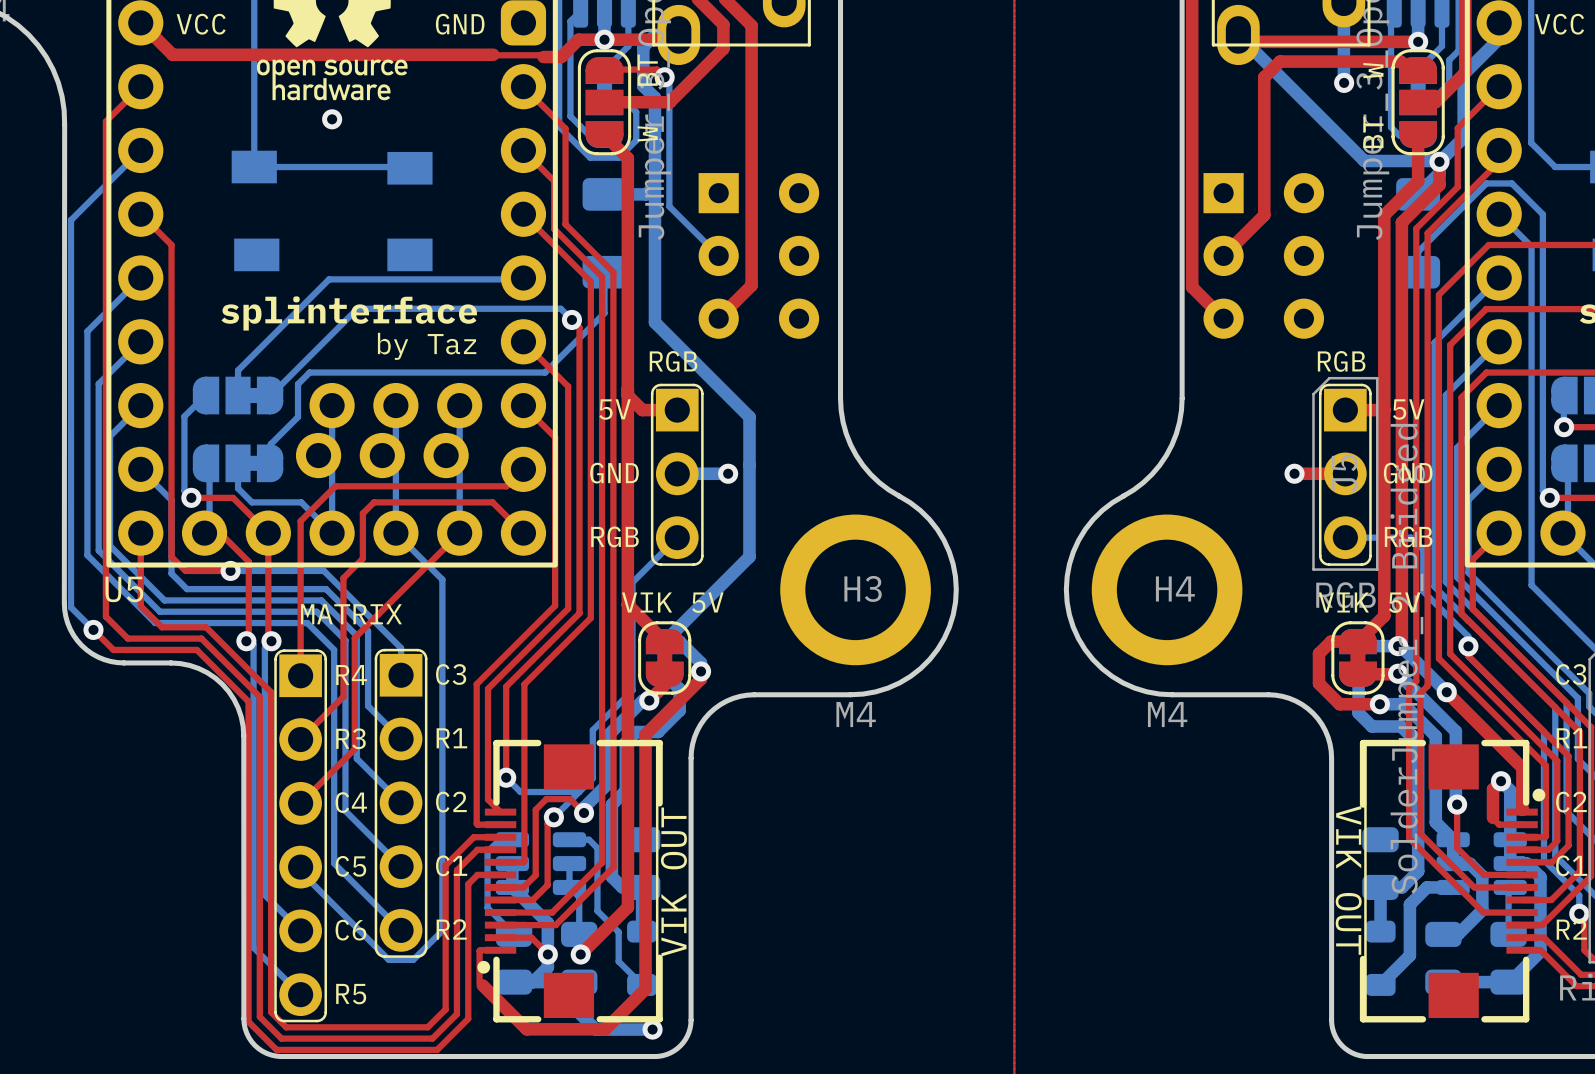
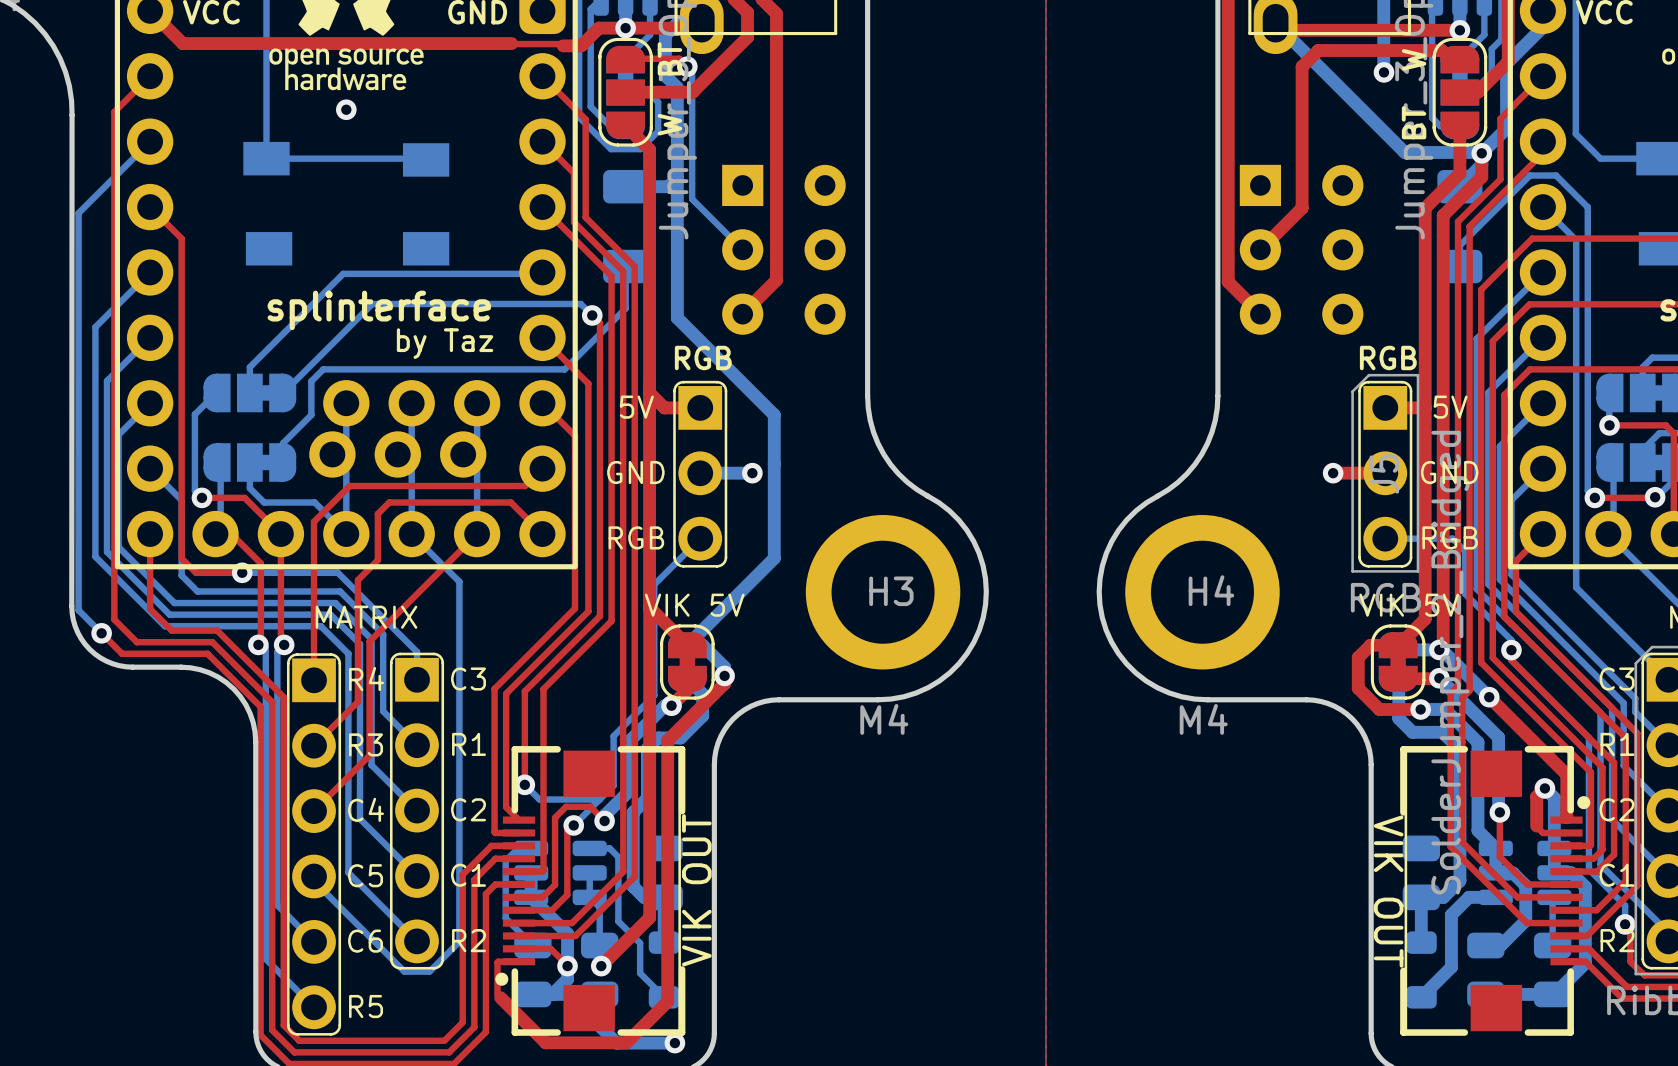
U5 name: U5 (124, 589) -> none

